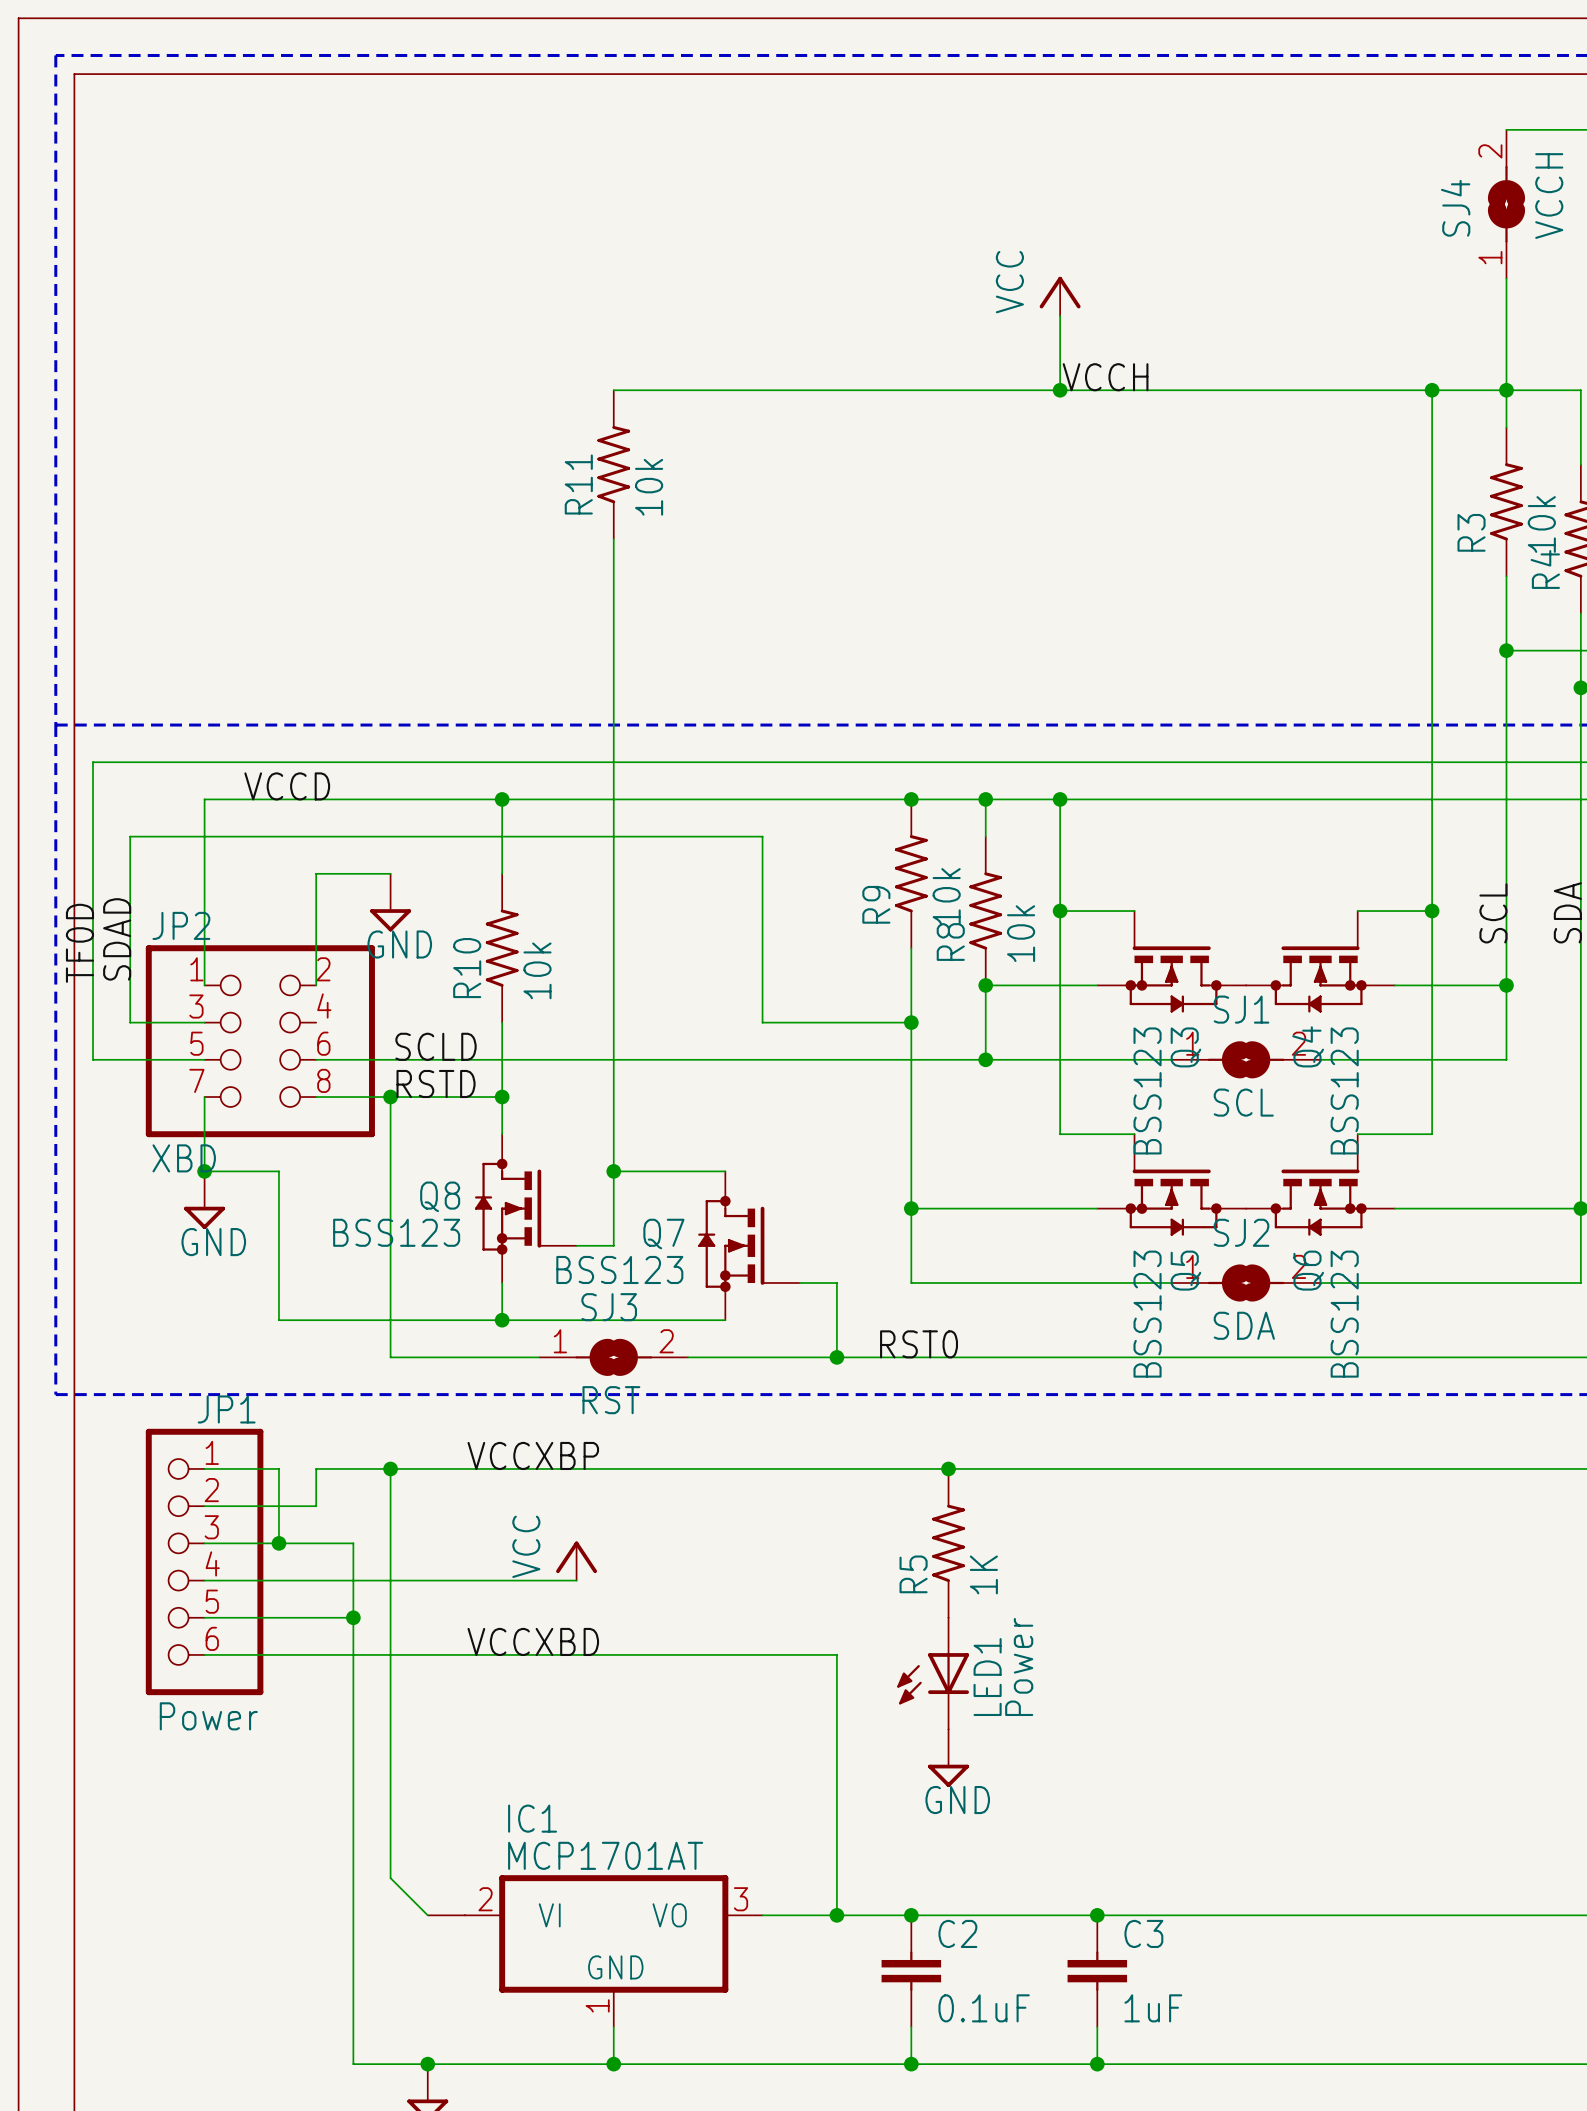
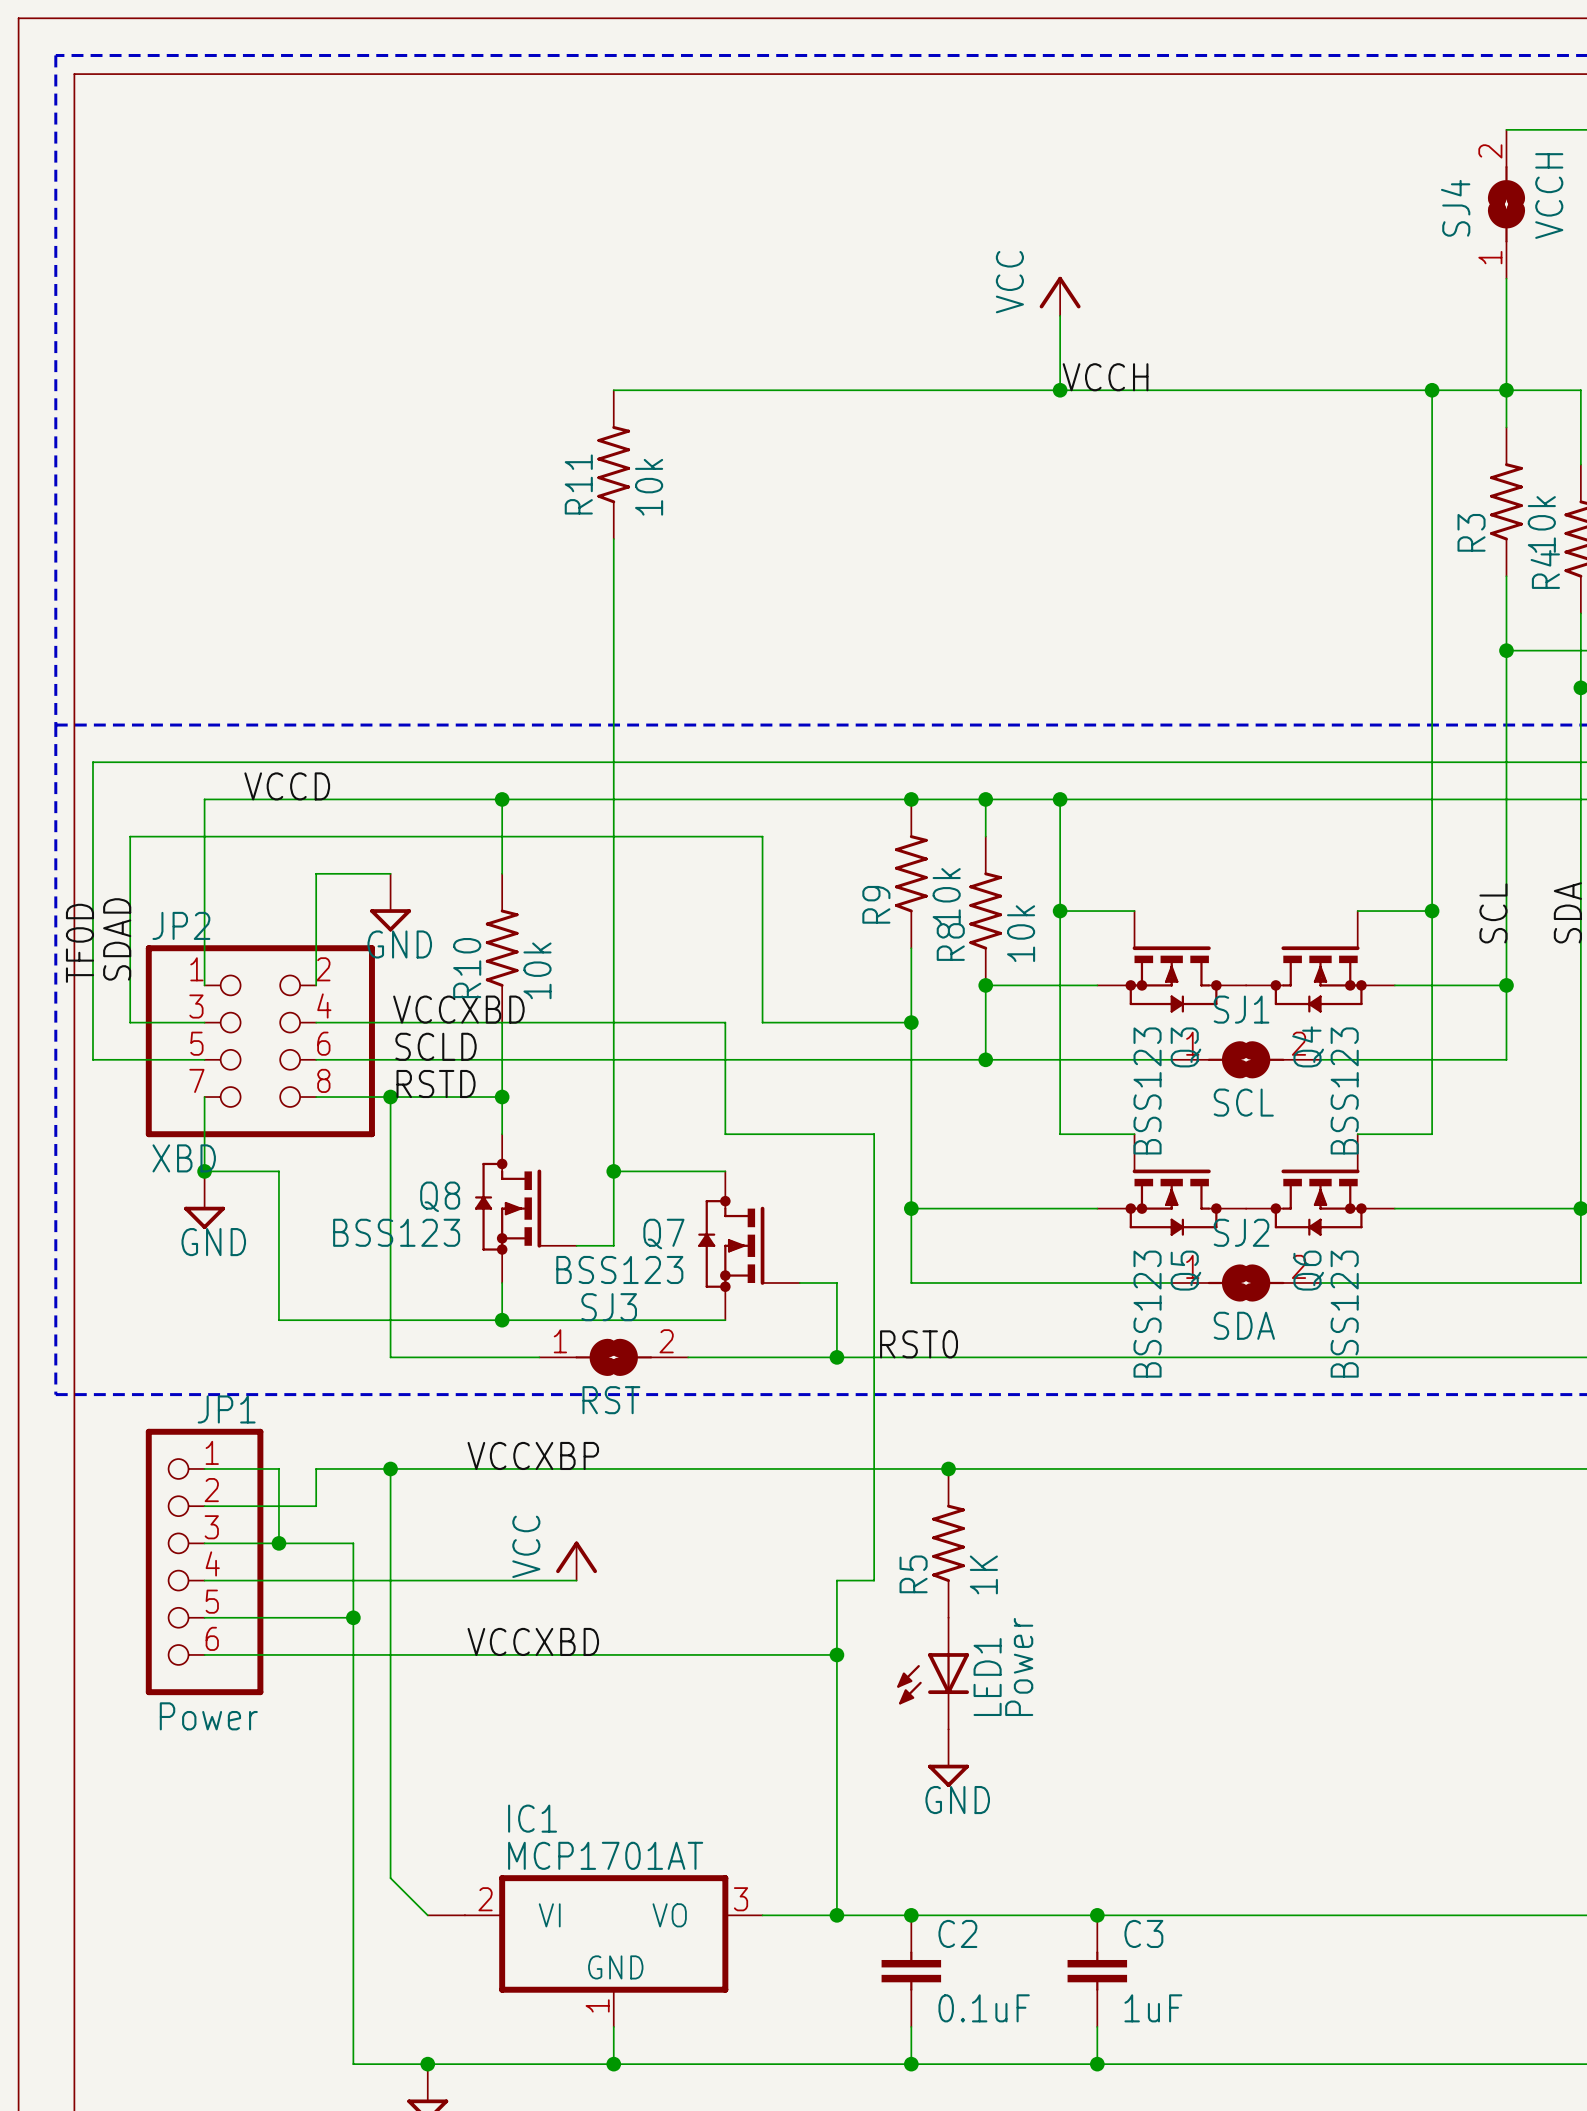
label: none -> VCCXBD (458, 1009)
wire: none -> (316, 1022) (725, 1022) (725, 1134) (874, 1134) (874, 1580) (836, 1580) (836, 1654)
junction: none -> (836, 1654)

